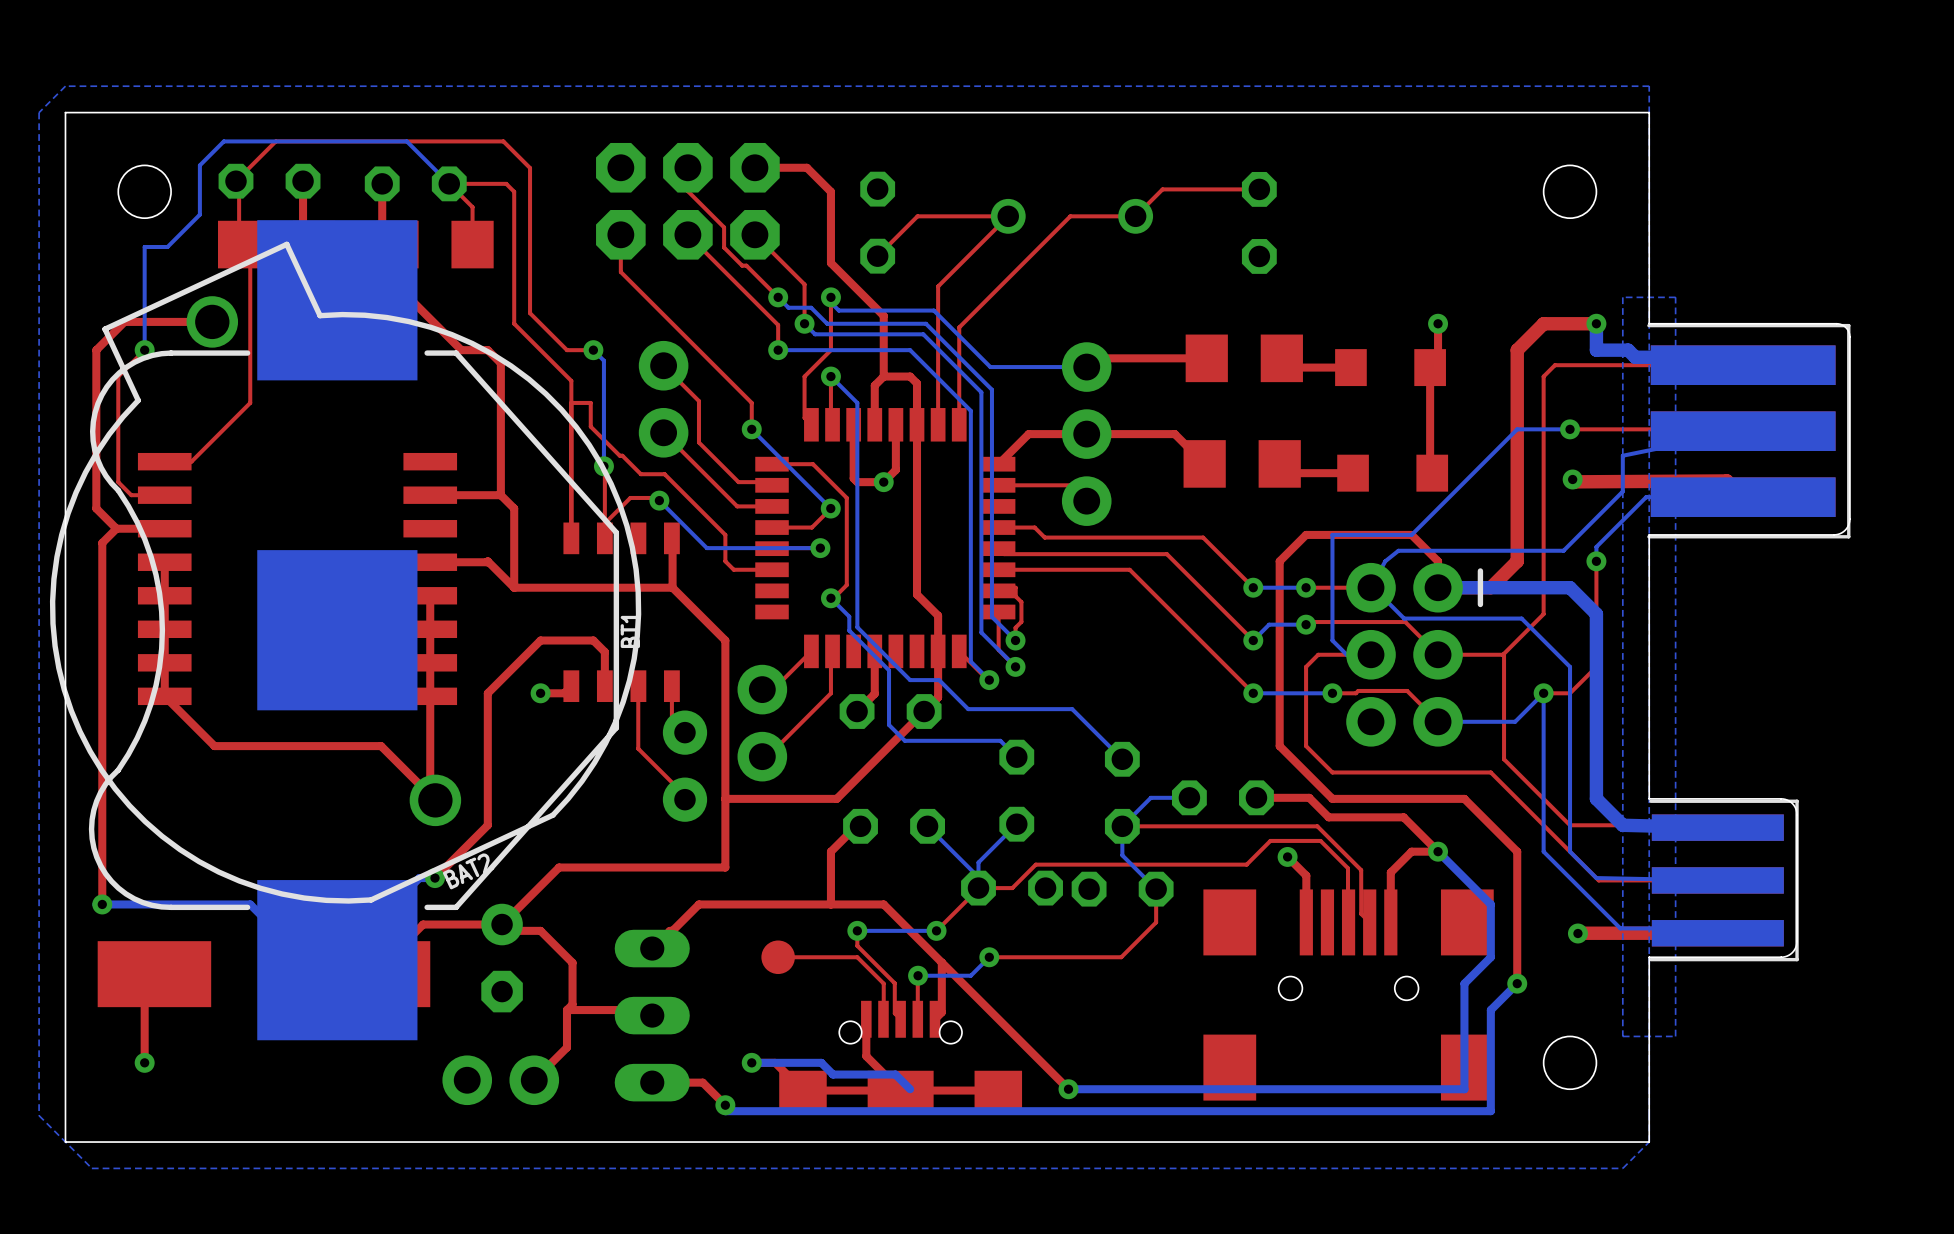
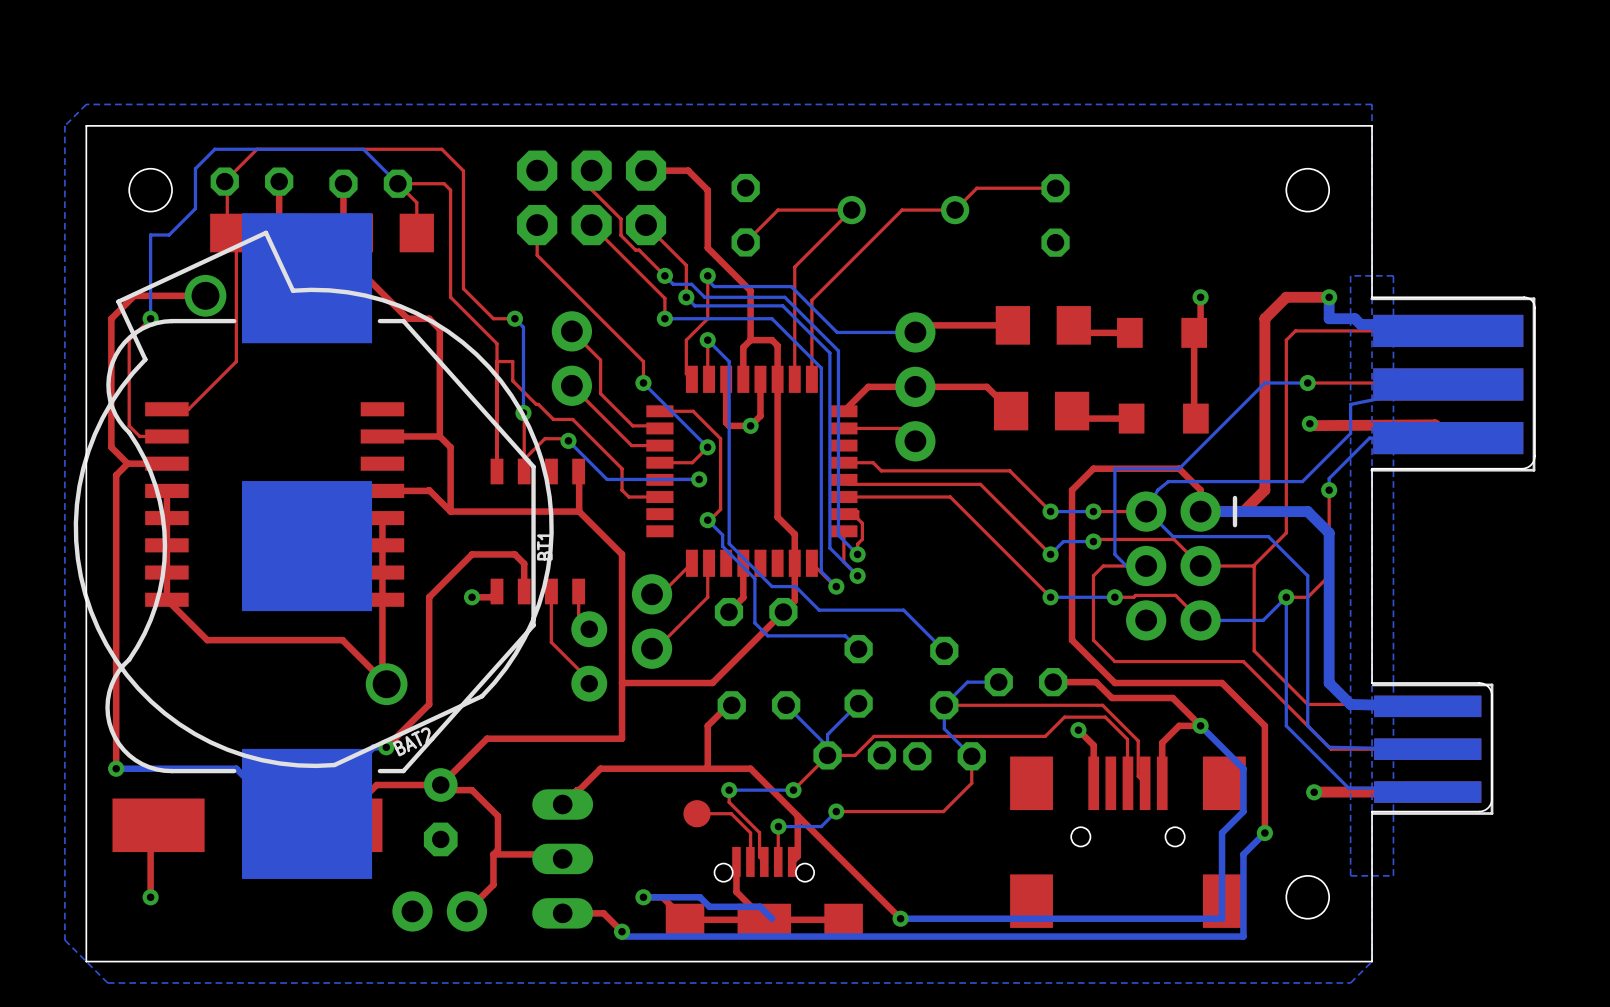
top track: (778, 957) (857, 957) (859, 959) -> (697, 813) (731, 813)
part position: (778, 957) -> (697, 813)

